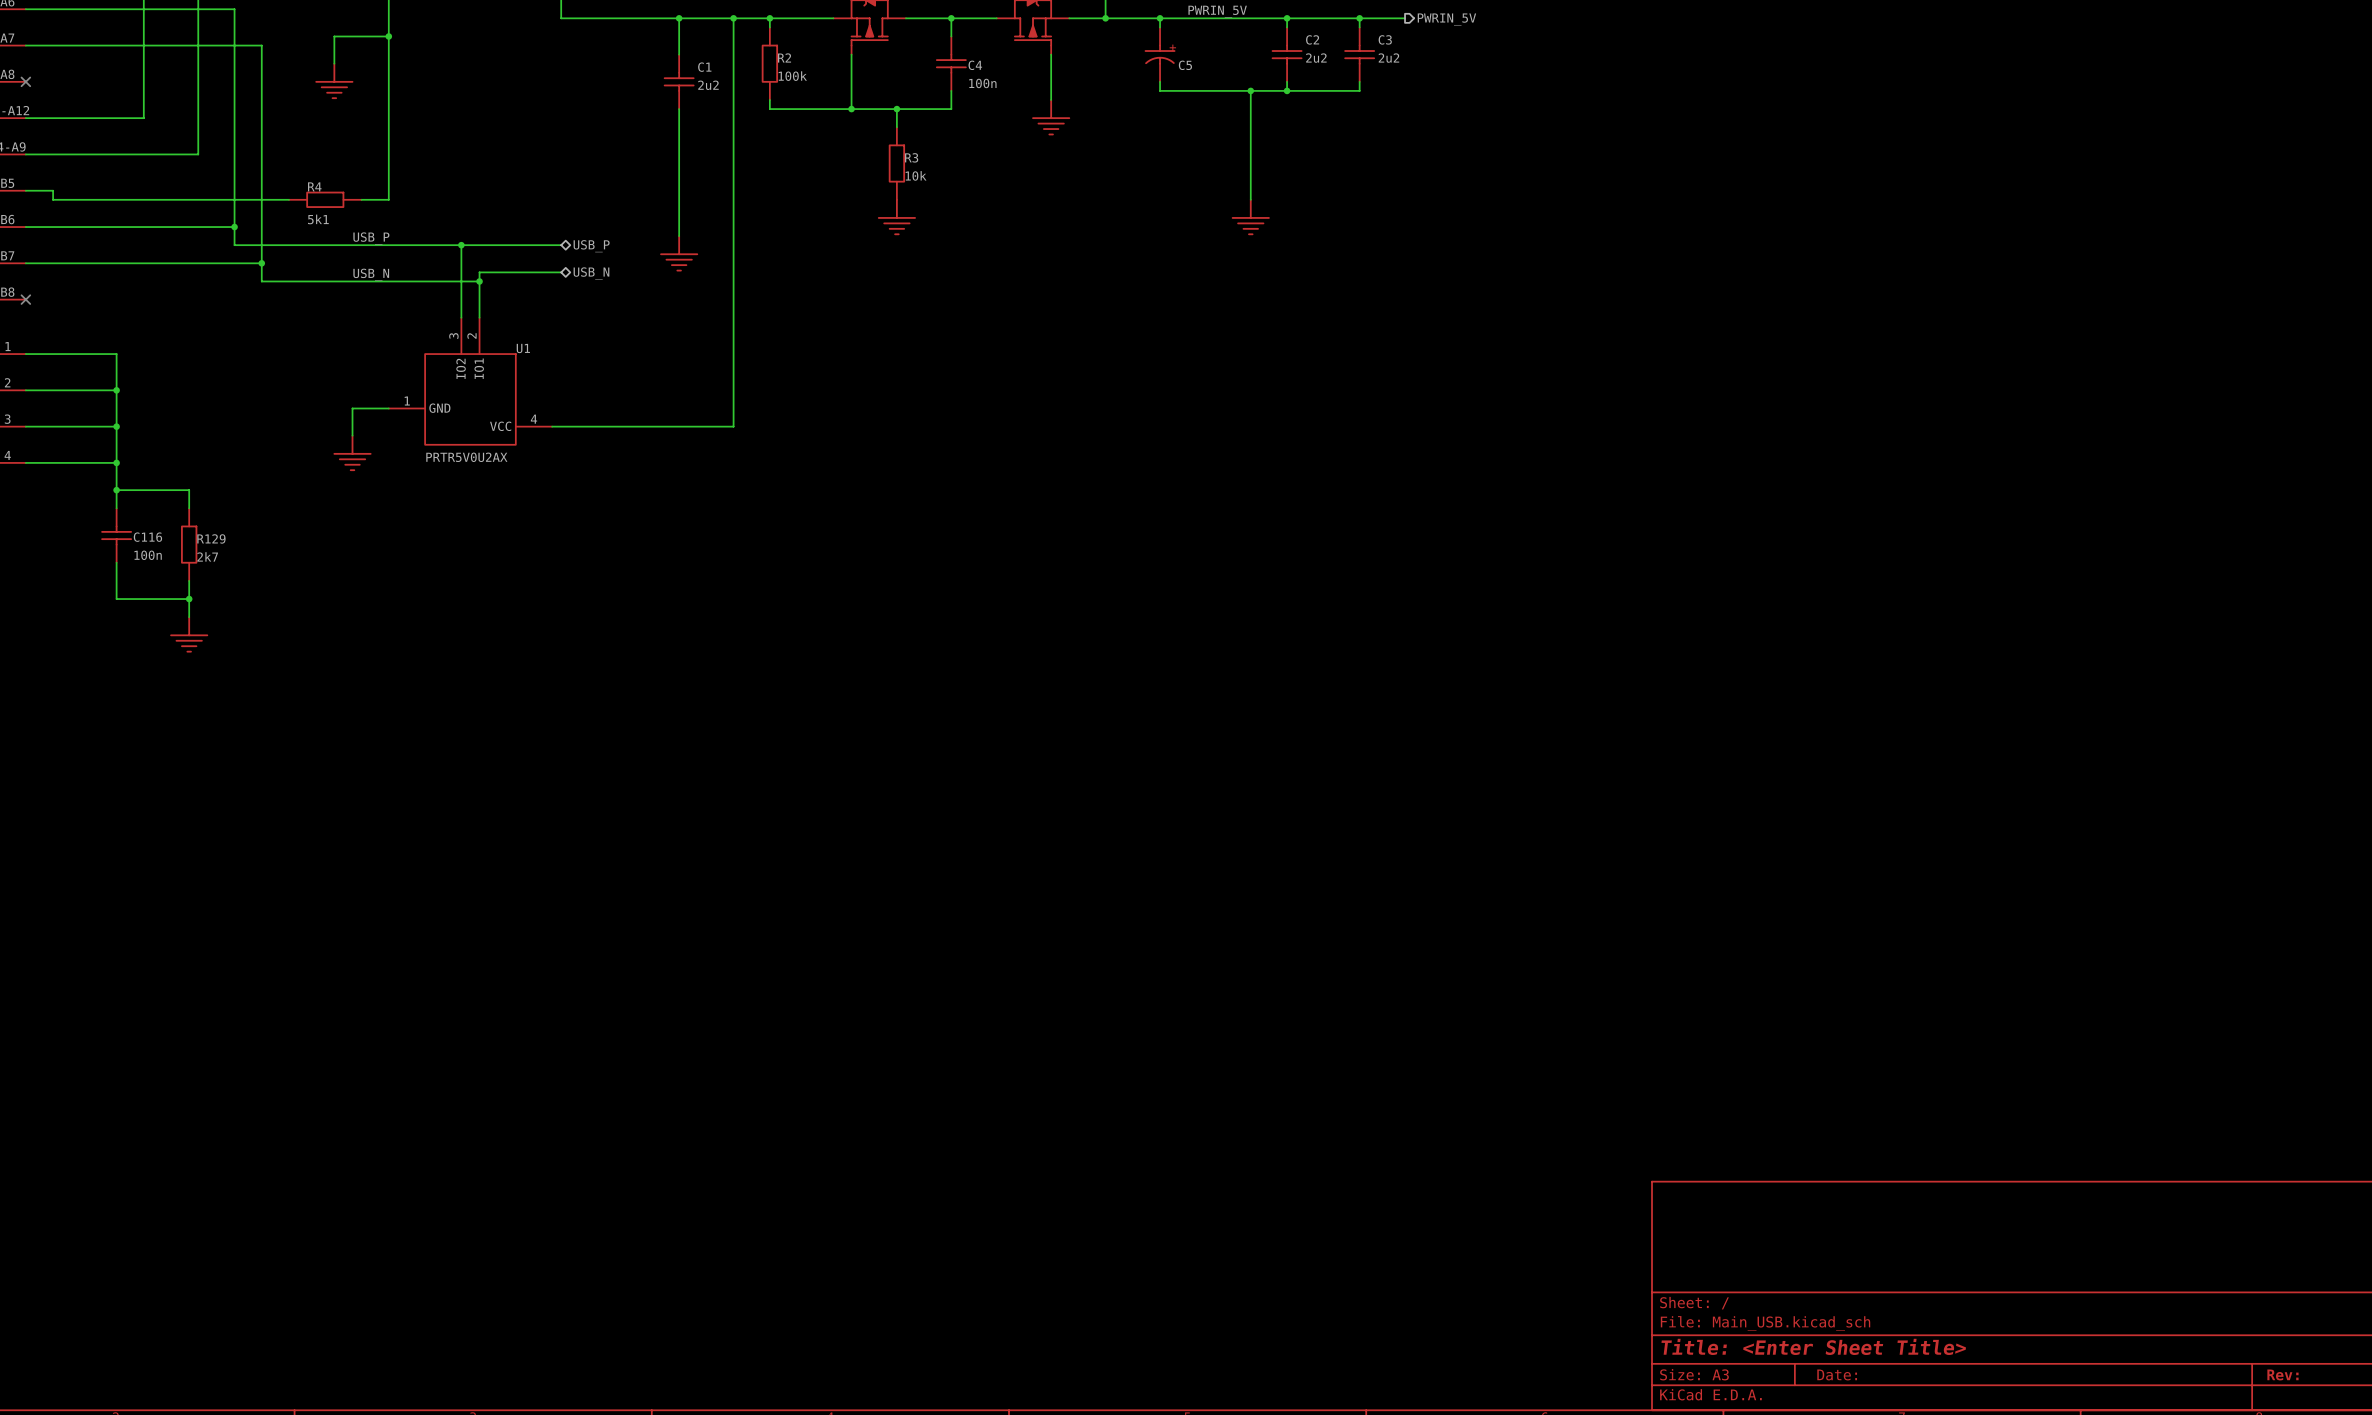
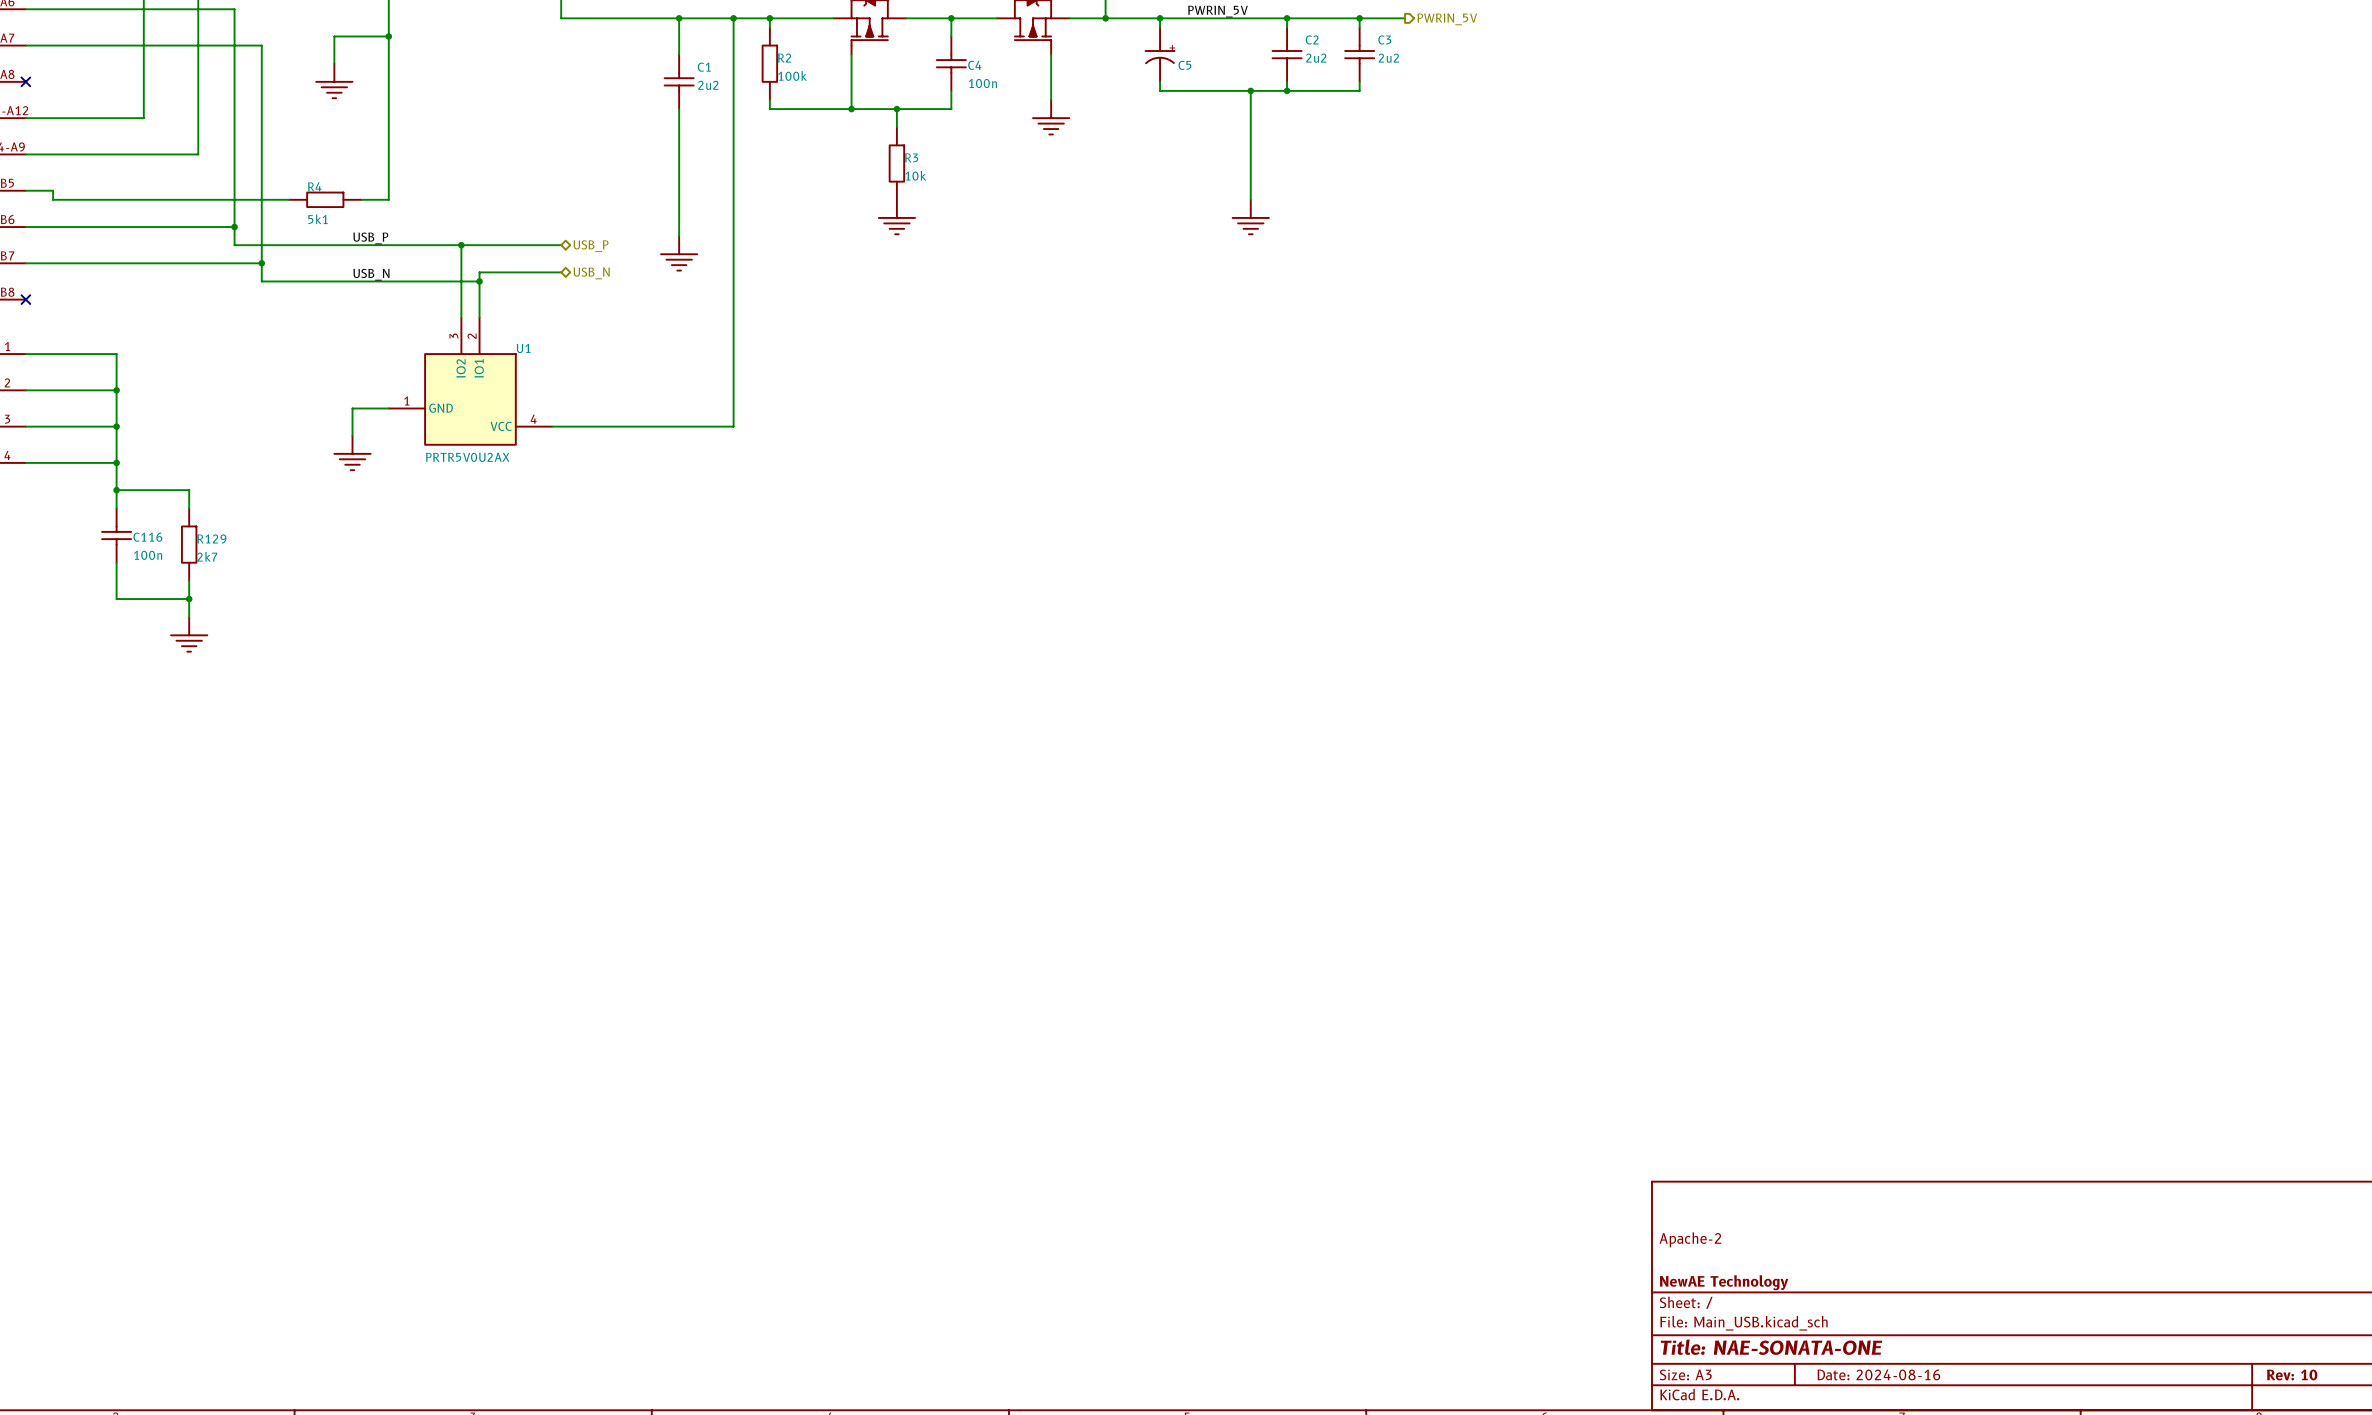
title block: none -> Apache-2 (1690, 1239)
title block: none -> NewAE Technology (1724, 1282)
title block: Title: <Enter Sheet Title> (1813, 1346) -> Title: NAE-SONATA-ONE (1771, 1347)
title block: Date: (1837, 1374) -> Date: 2024-08-16 (1878, 1374)
title block: Rev: (2282, 1374) -> Rev: 10 (2292, 1374)

